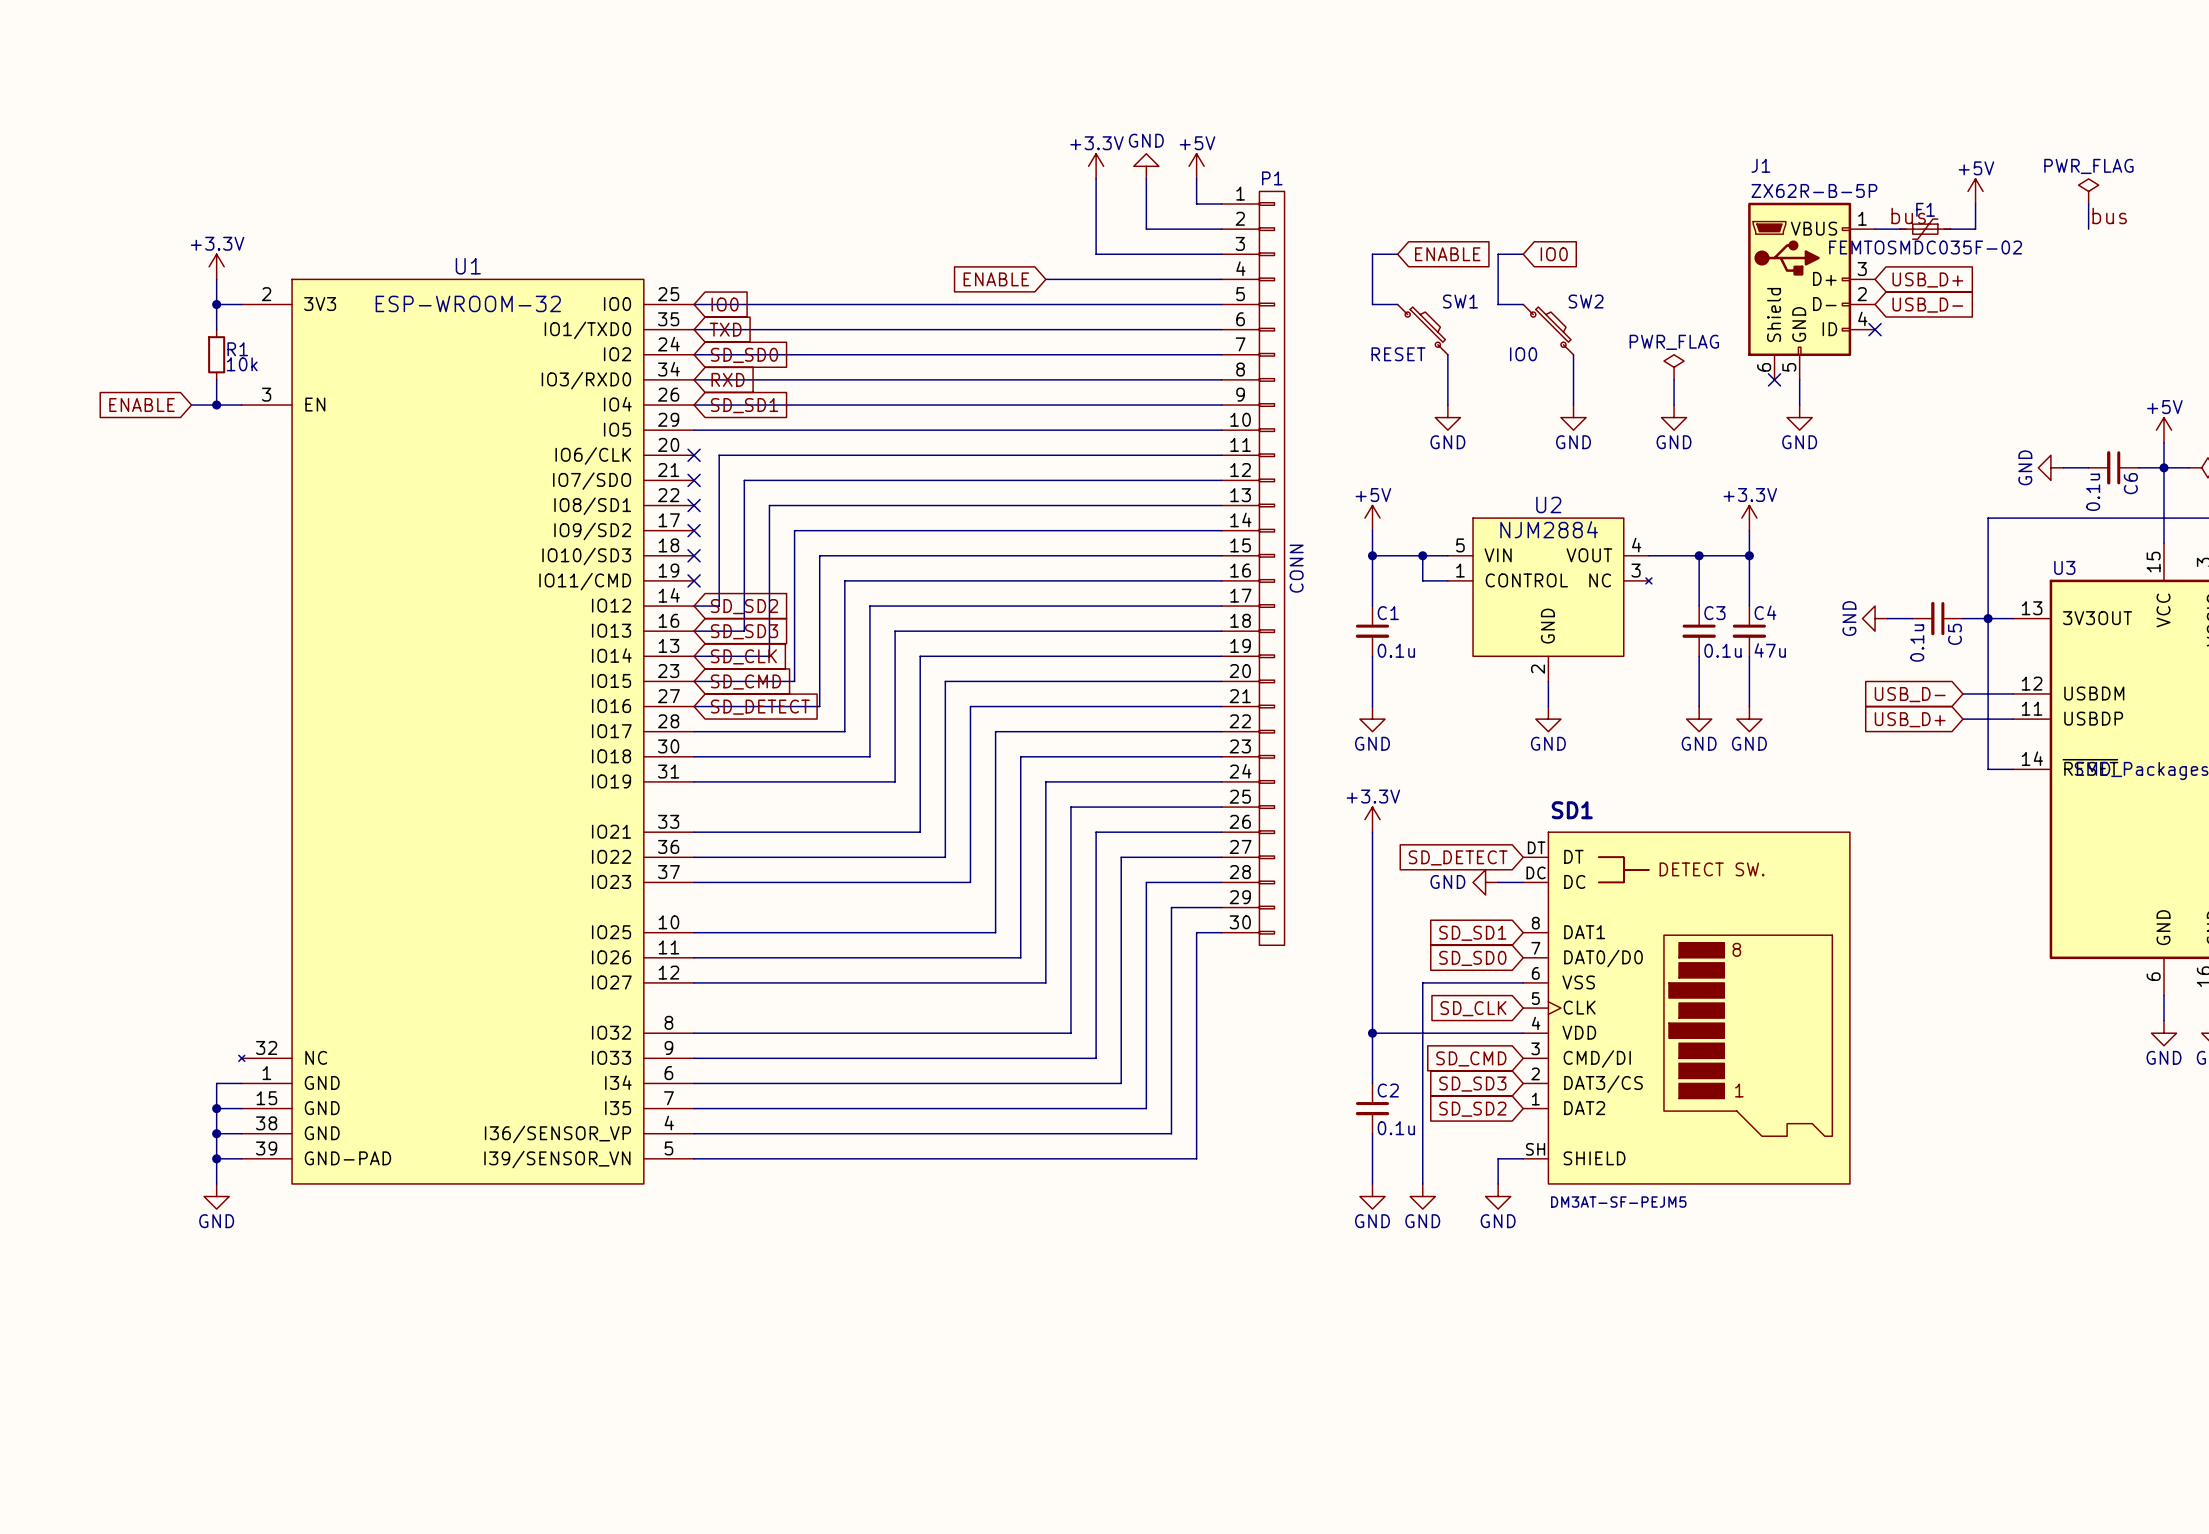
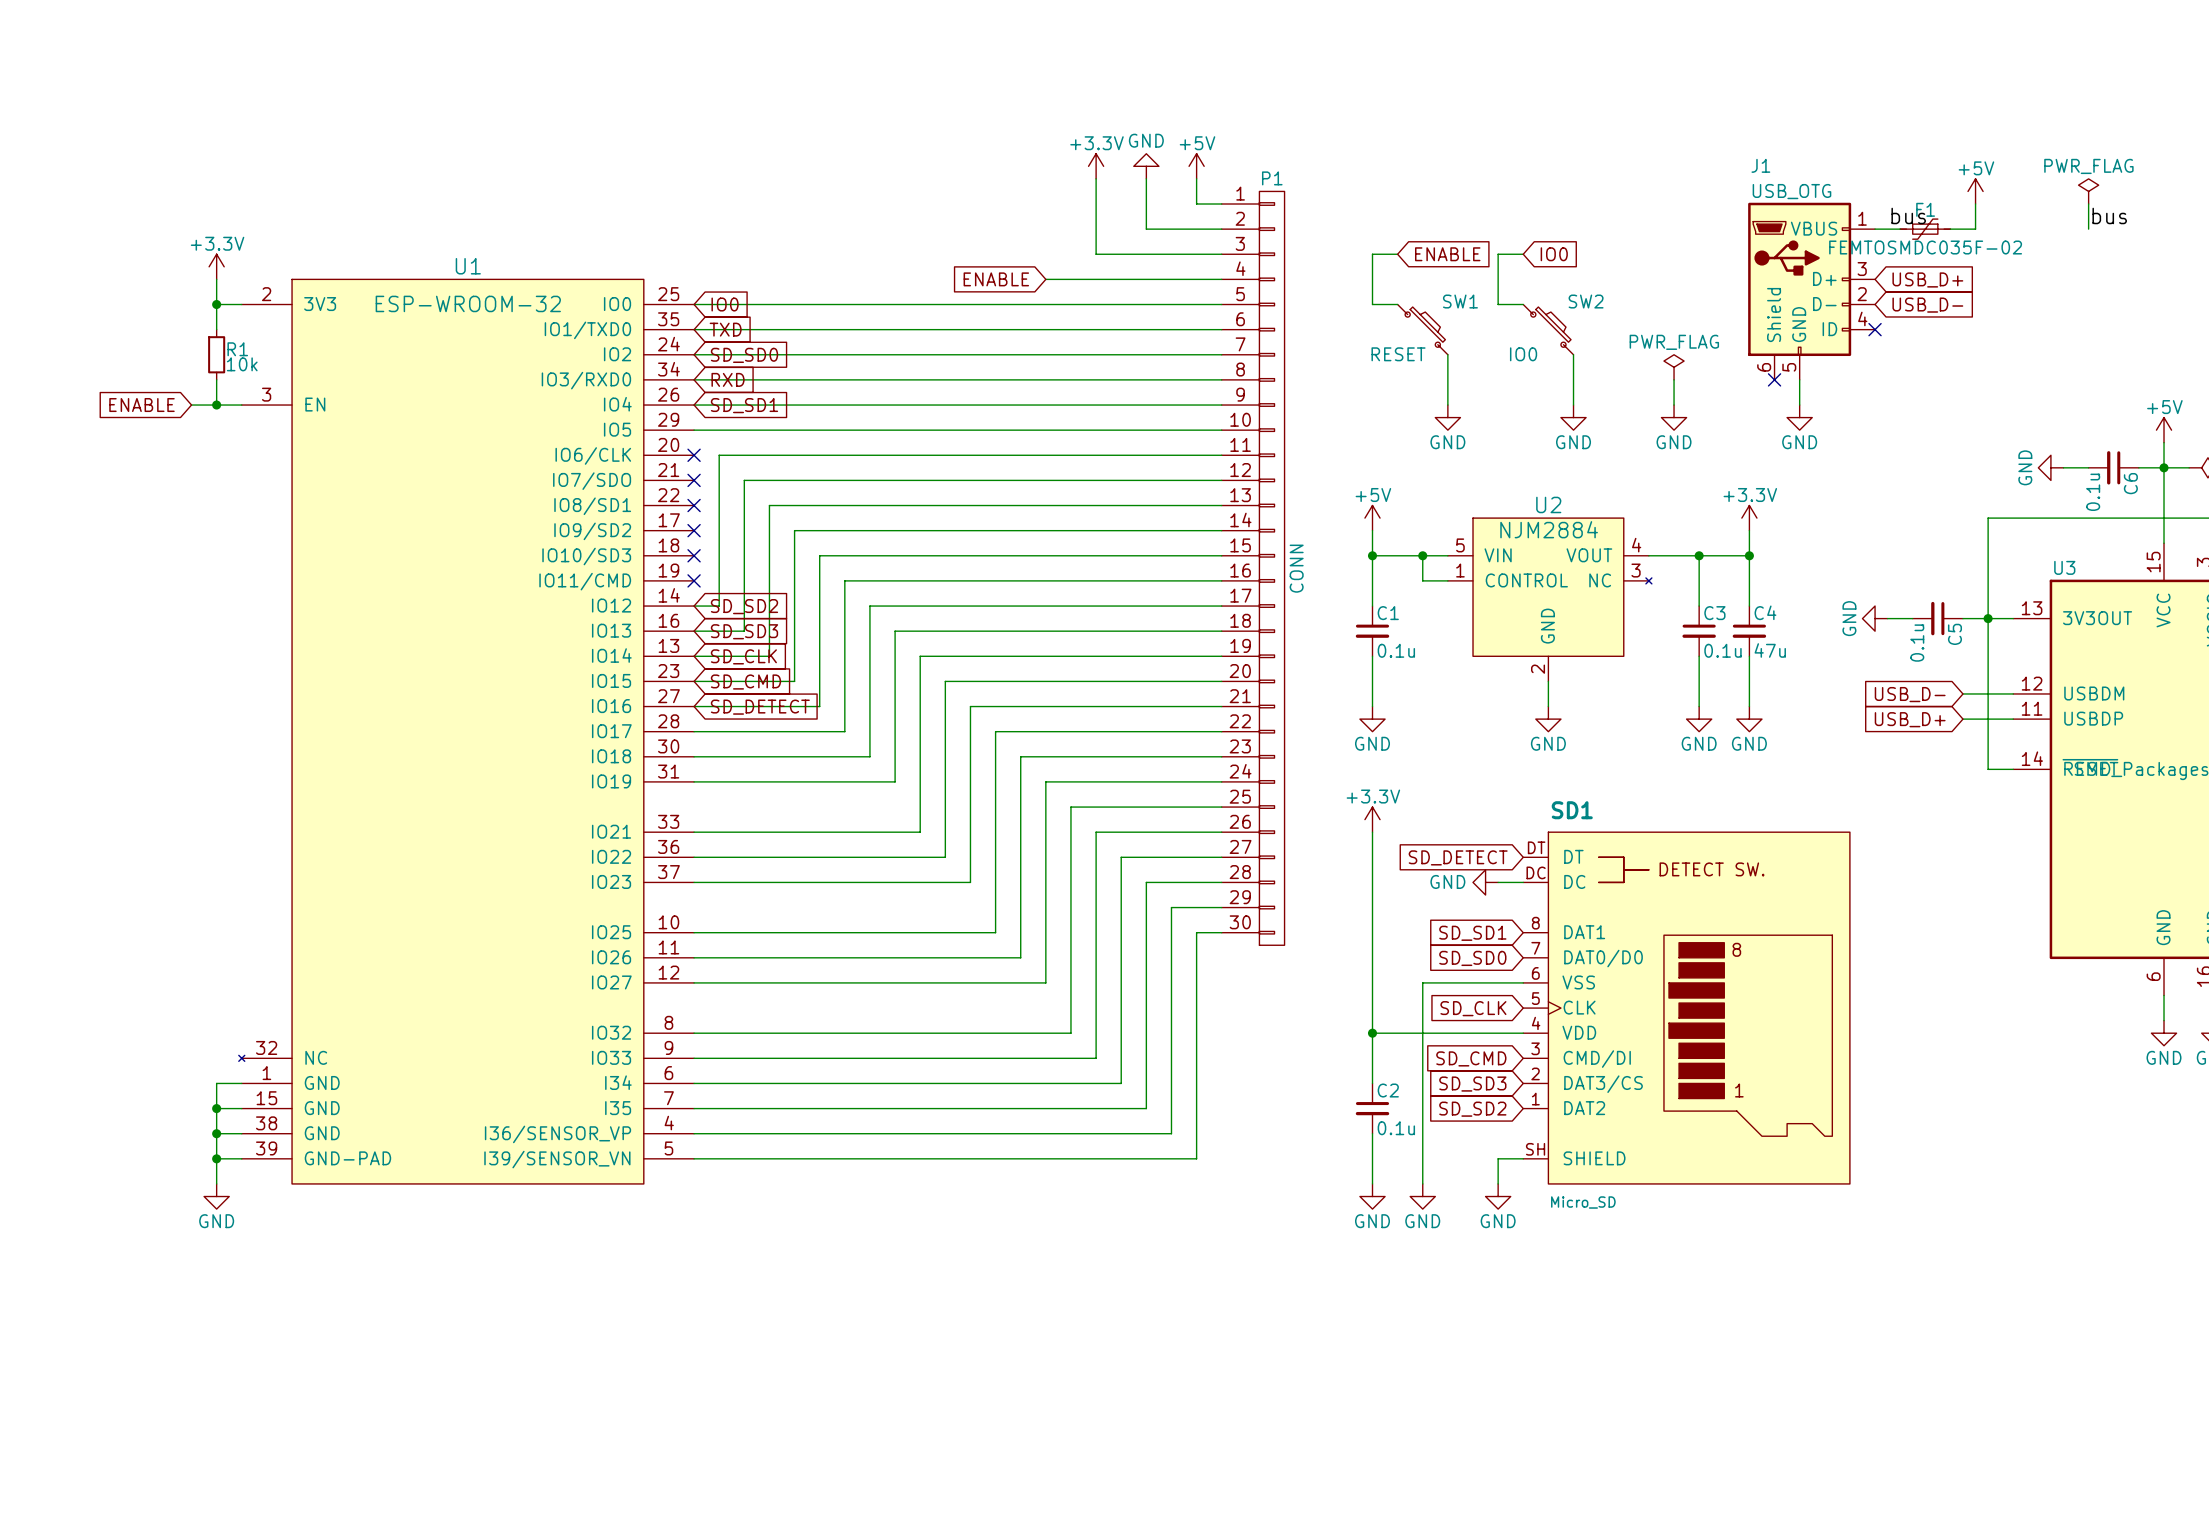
J1 value: ZX62R-B-5P (1814, 190) -> USB_OTG (1791, 191)
SD1 value: DM3AT-SF-PEJM5 (1618, 1202) -> Micro_SD (1583, 1202)

